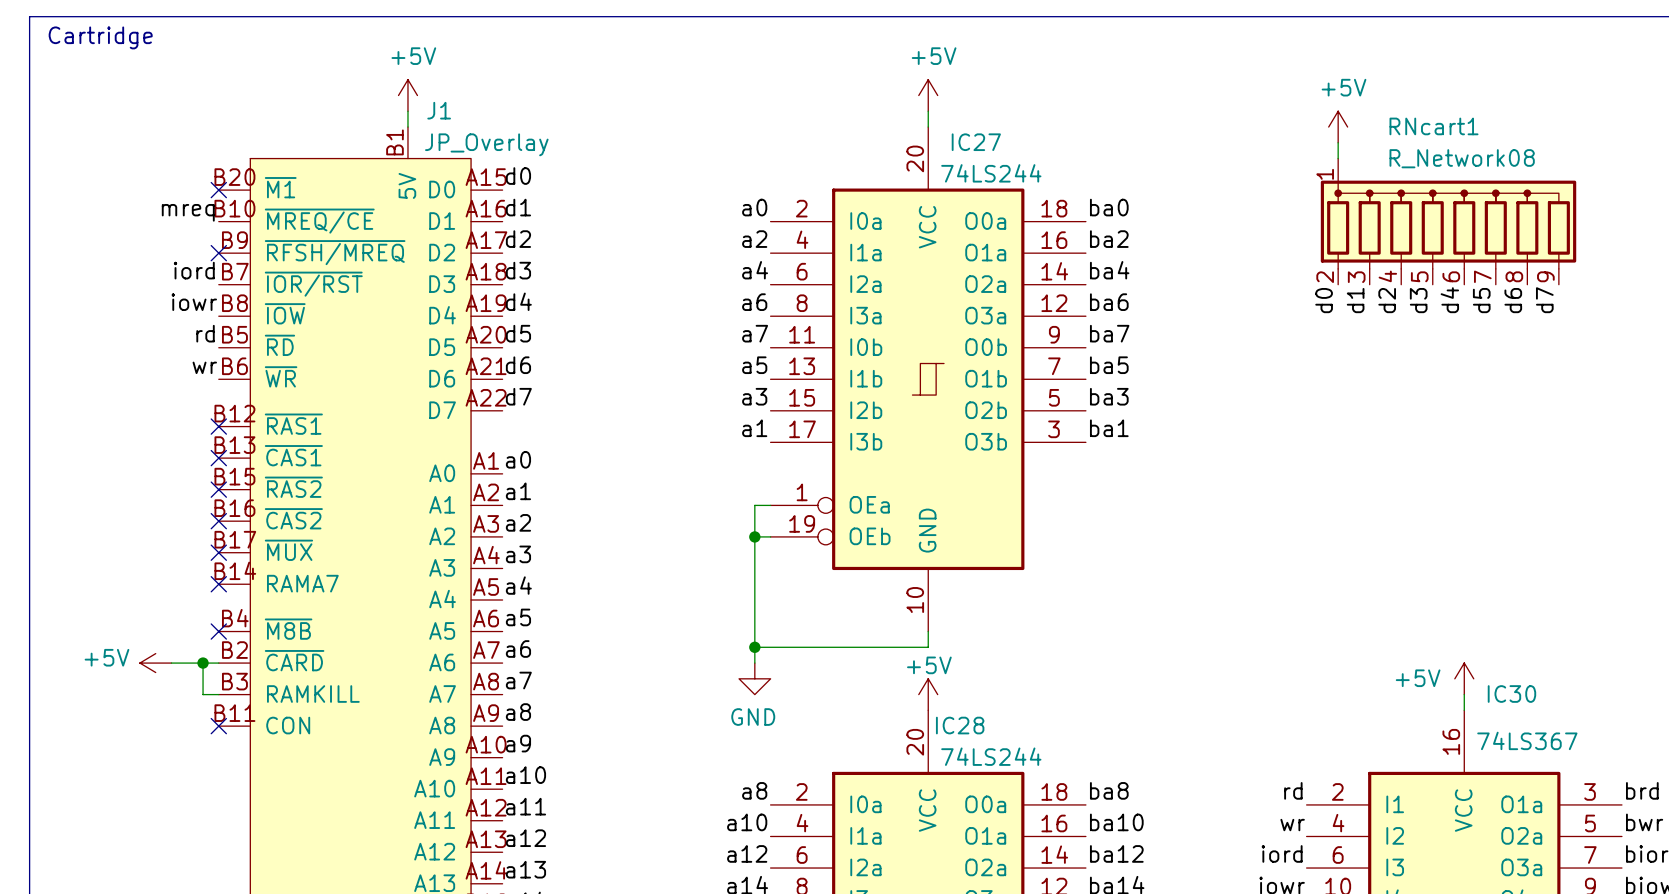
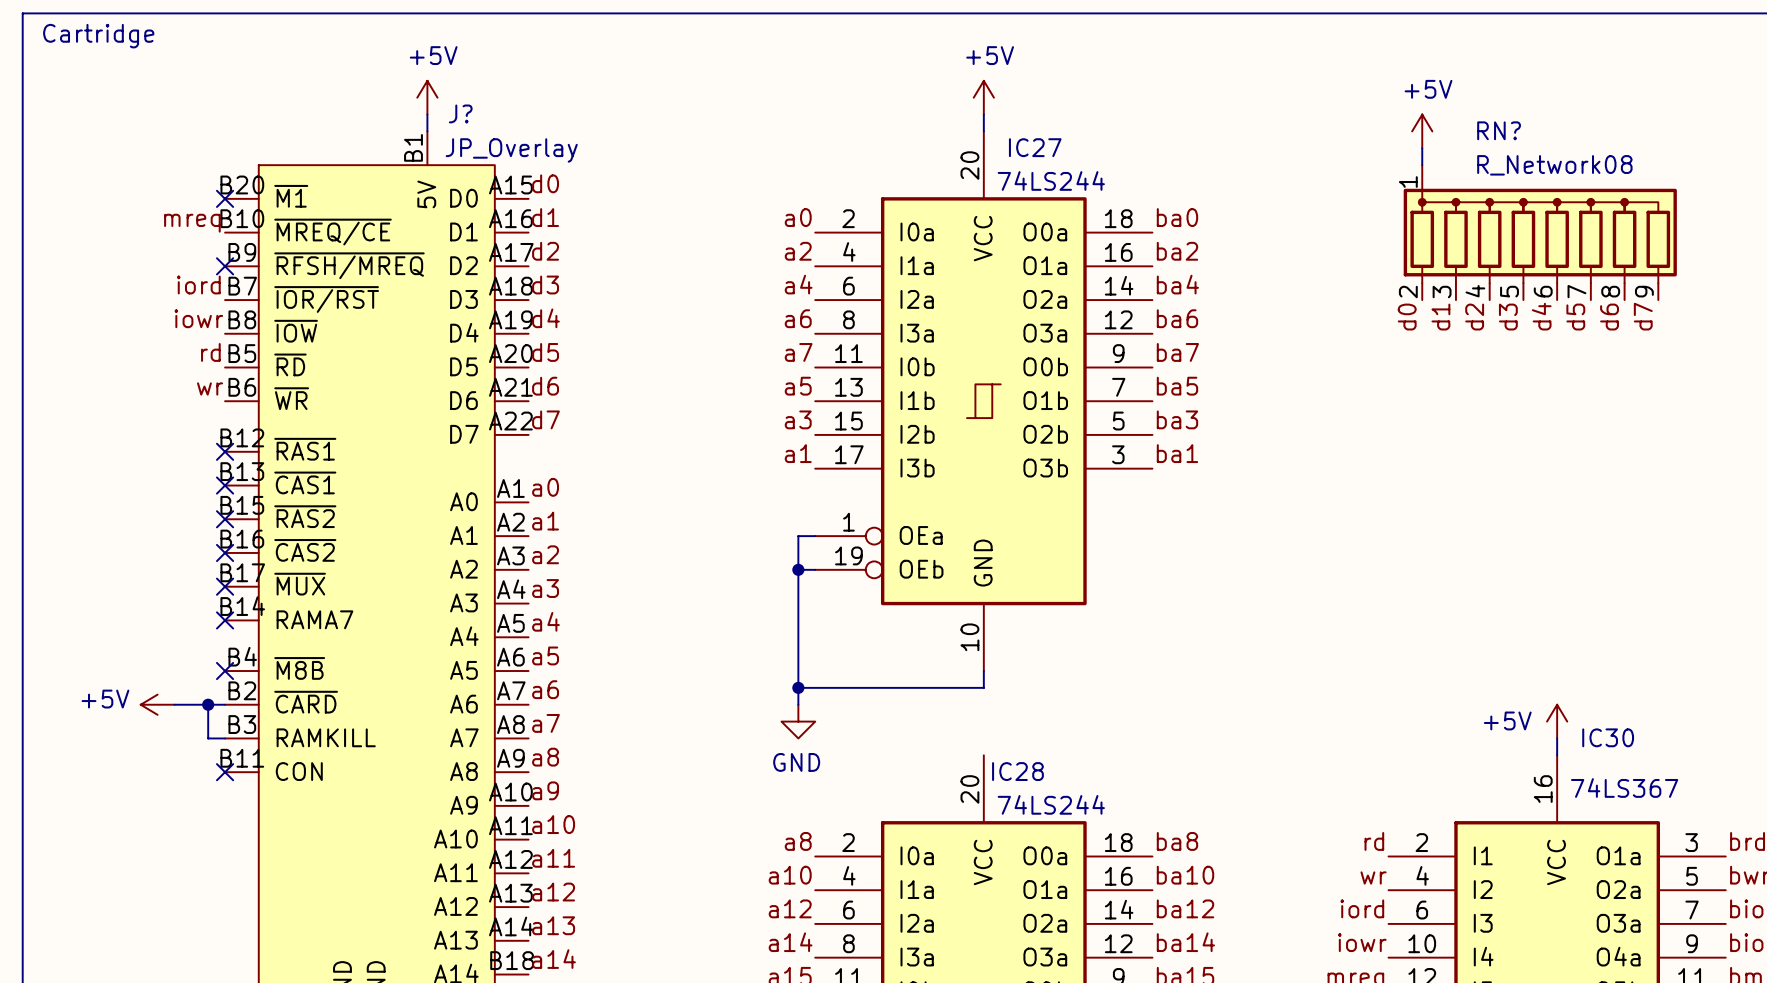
J1 name: J1 (439, 110) -> J? (460, 113)
RNcart1 name: RNcart1 (1434, 126) -> RN? (1499, 130)
power symbol: +5V (928, 694) -> none

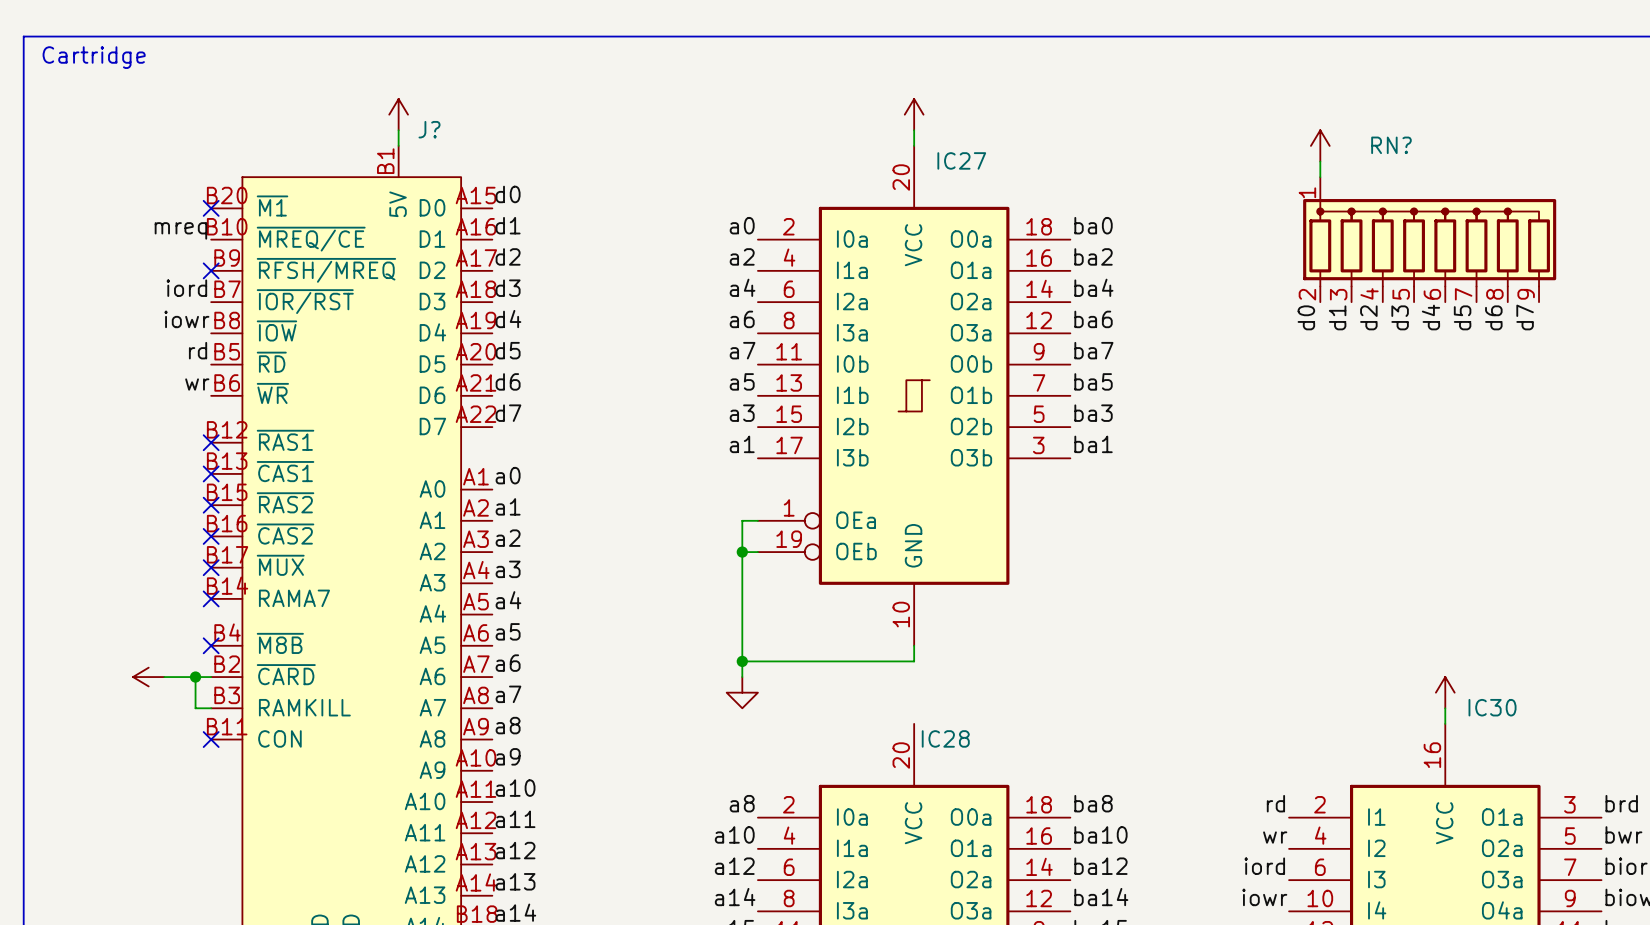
power symbol text: +5V (433, 55) -> none
power symbol text: +5V (990, 55) -> none
power symbol text: +5V (1428, 89) -> none
J? value: JP_Overlay (511, 150) -> none
RN? value: R_Network08 (1554, 165) -> none
IC27 value: 74LS244 (1051, 180) -> none
power symbol text: +5V (105, 699) -> none
power symbol text: +5V (1507, 720) -> none
power symbol text: GND (796, 762) -> none
IC30 value: 74LS367 (1624, 788) -> none
IC28 value: 74LS244 (1051, 804) -> none

